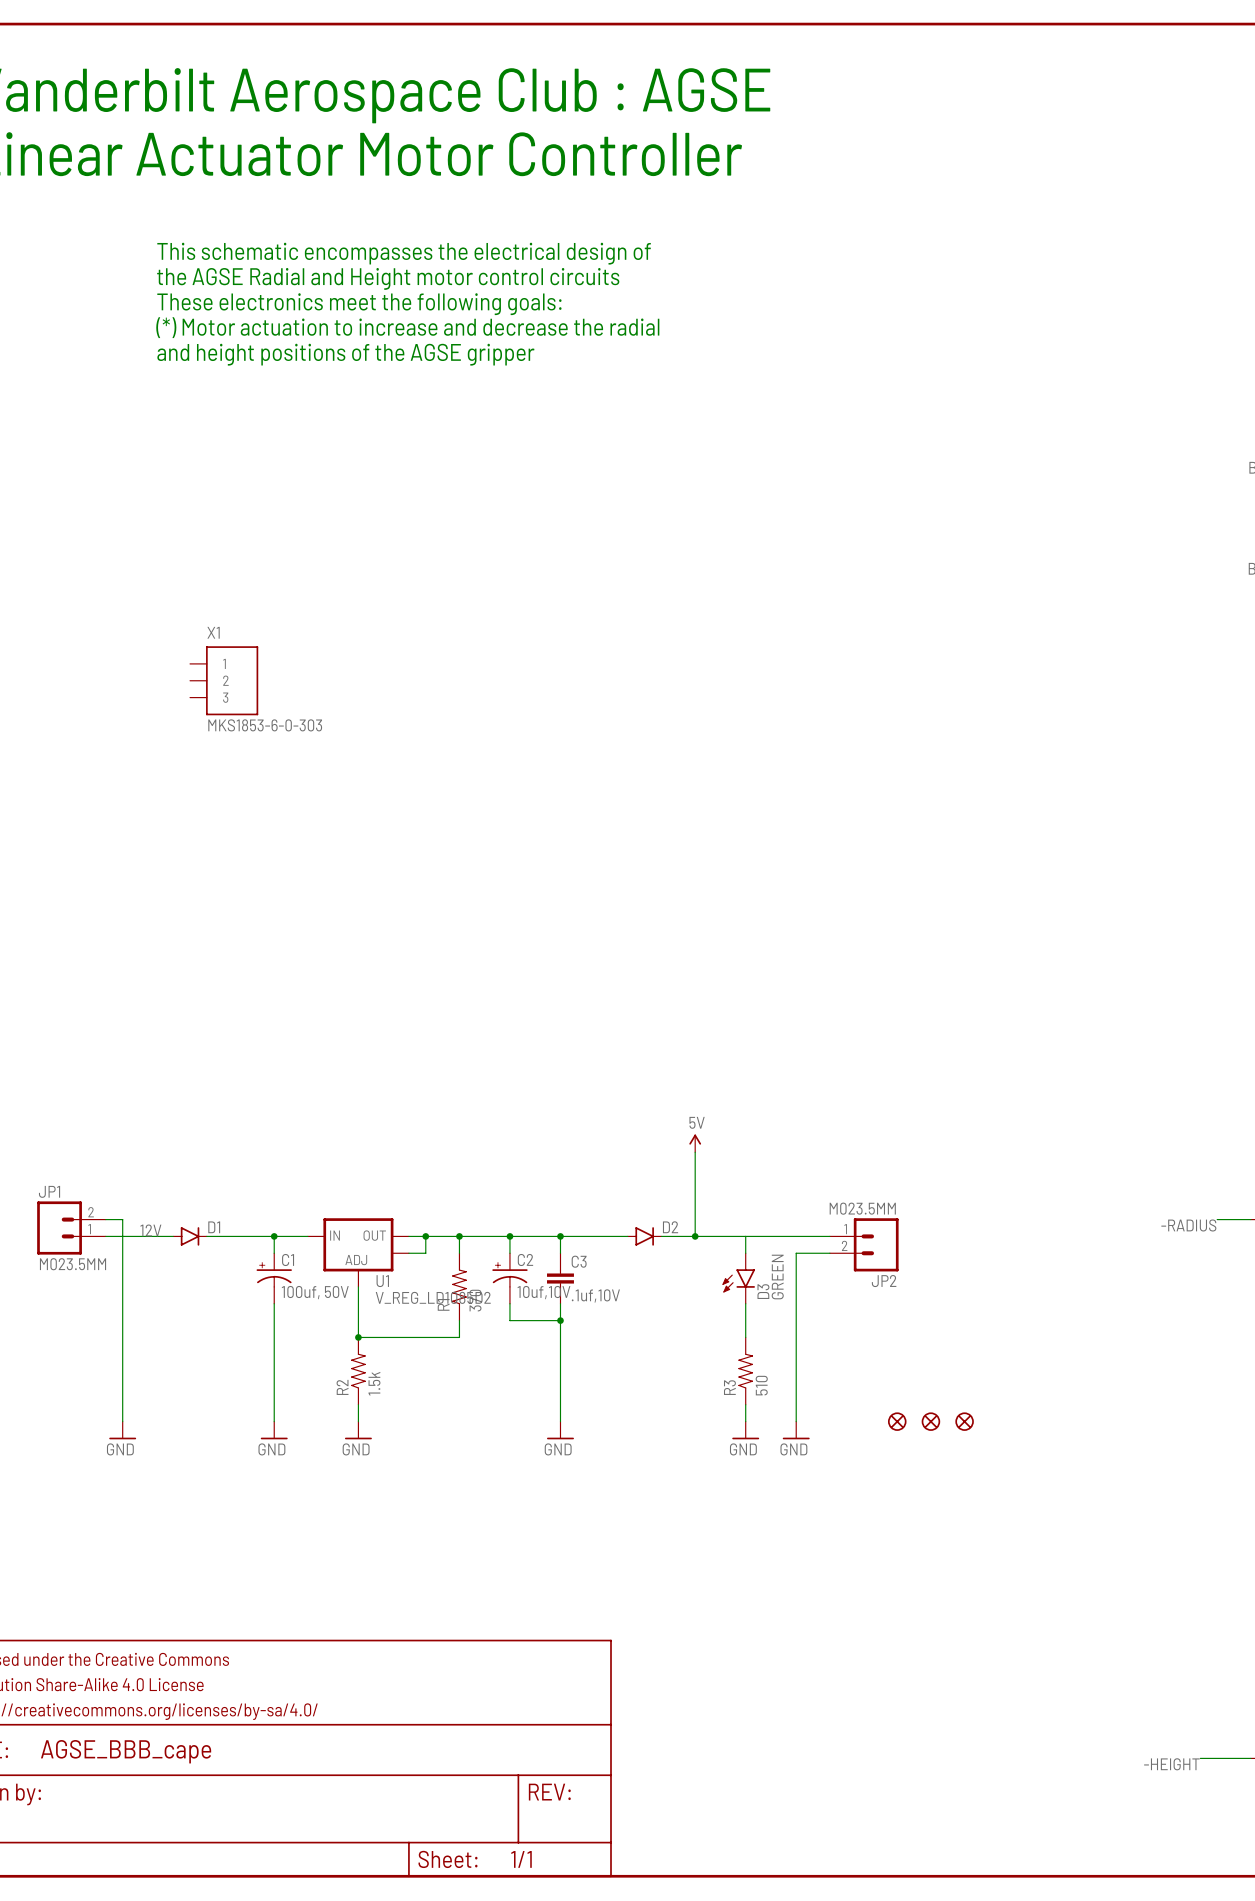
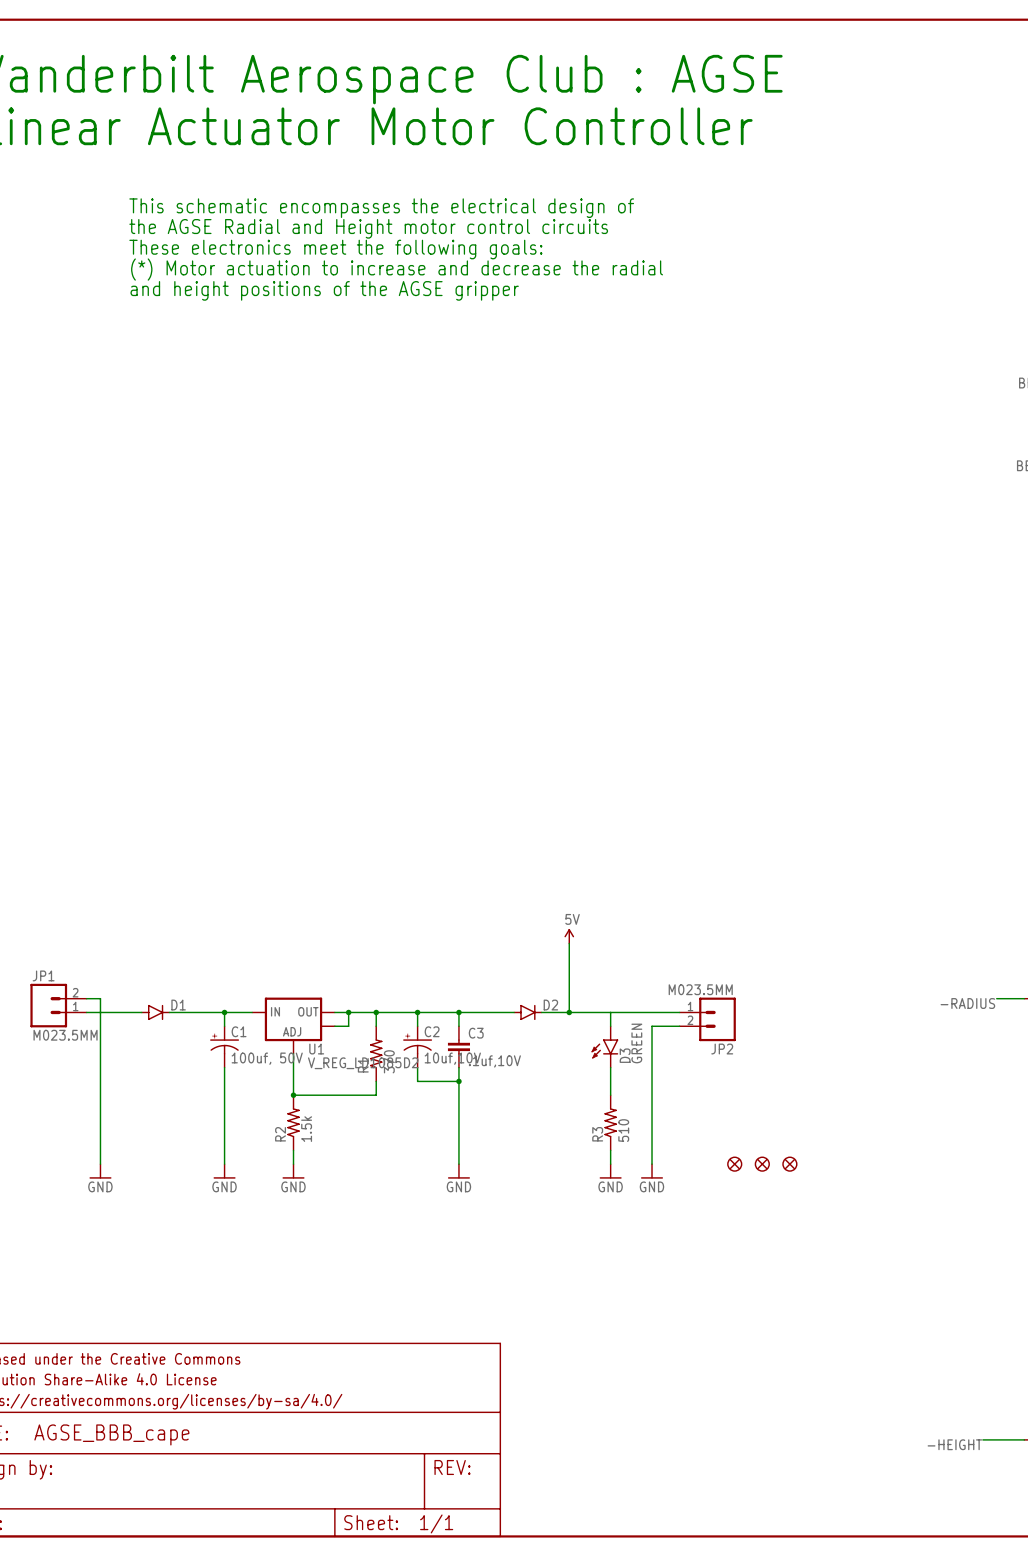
X1: MKS1853-6-0-303 (224, 680) -> none
label: 12V (150, 1230) -> none

